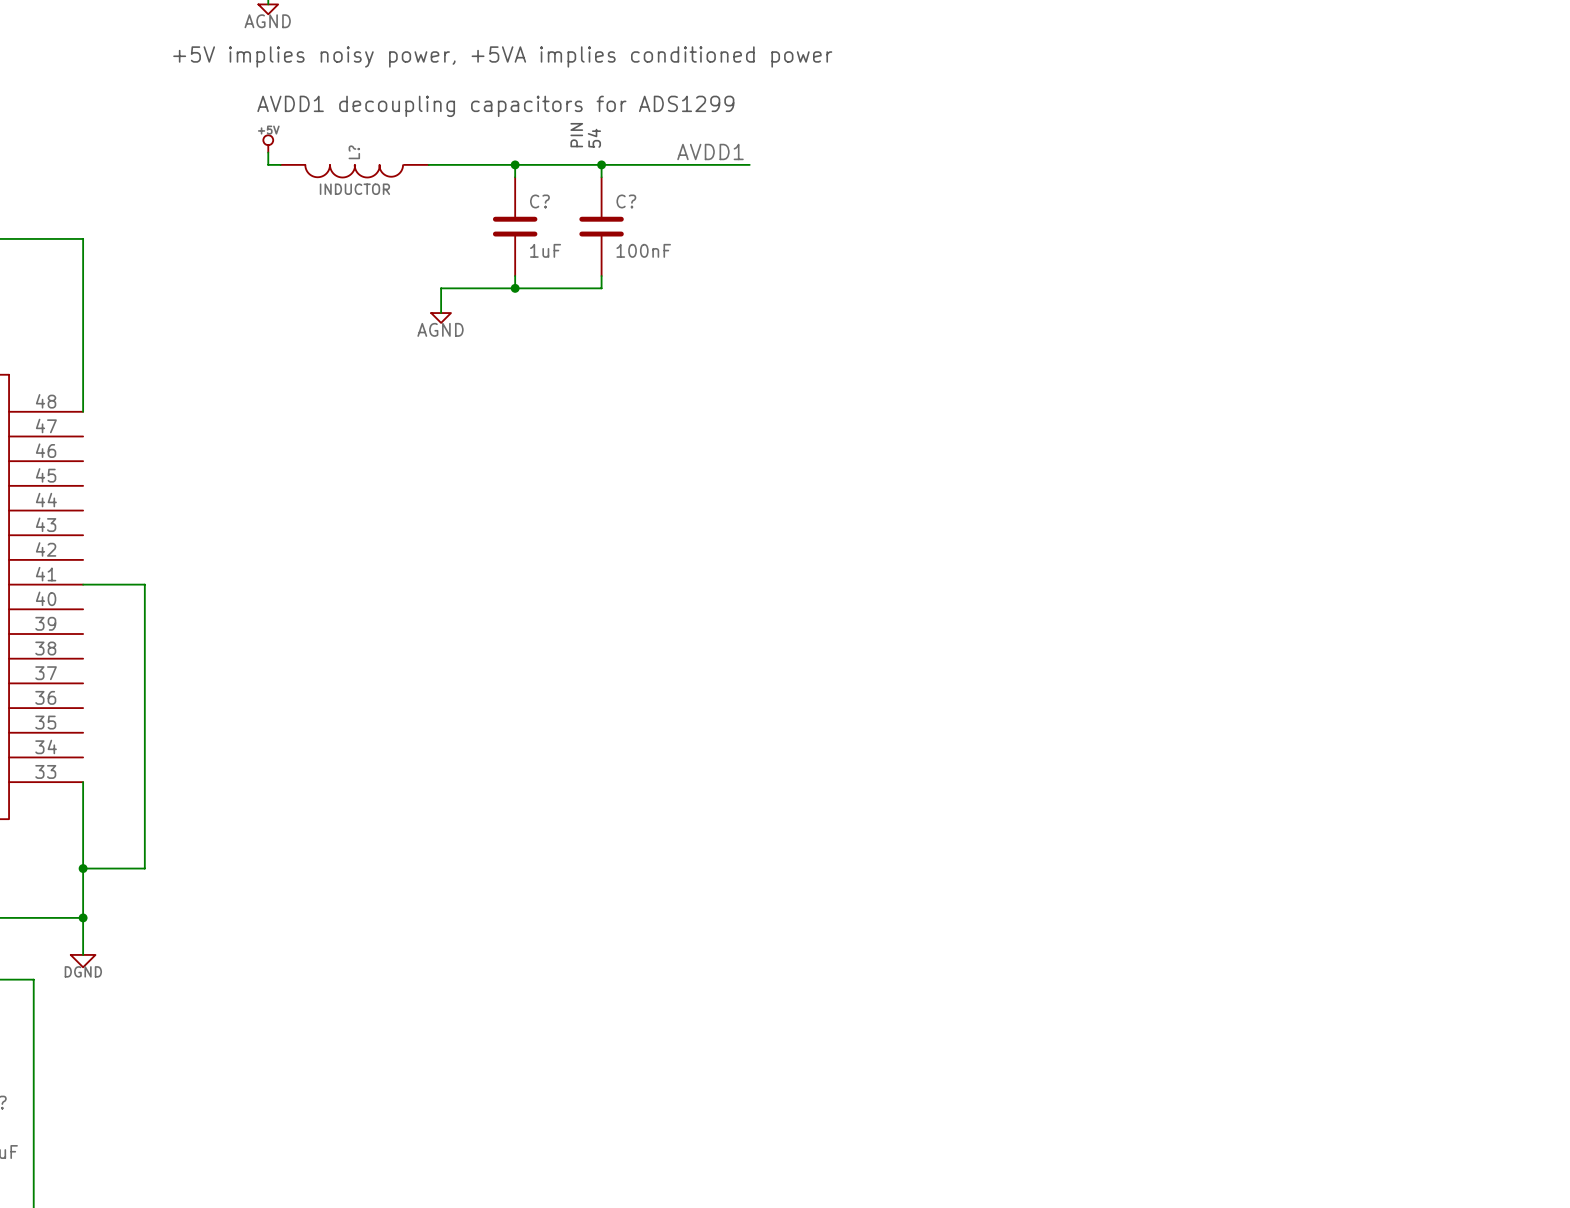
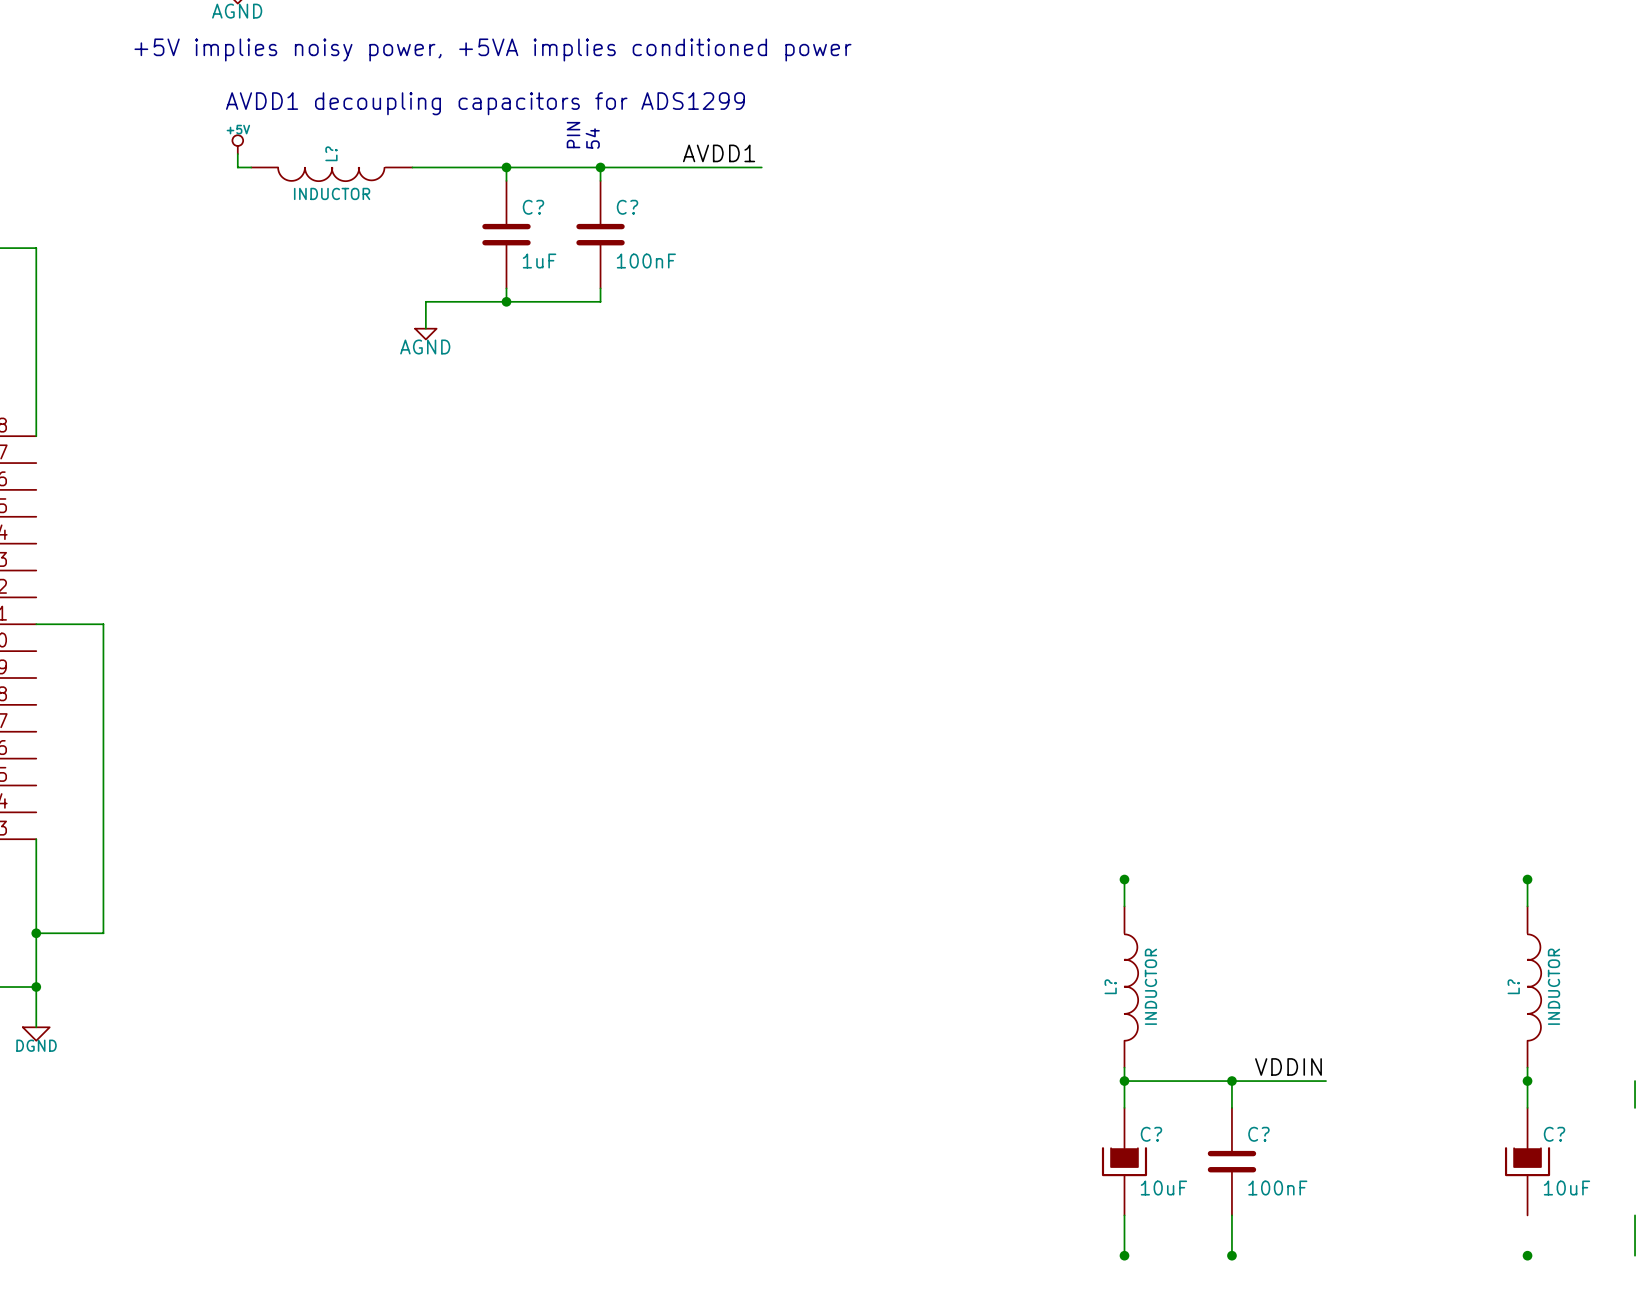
wire: none -> (1124, 879) (1124, 906)
junction: none -> (1124, 879)
wire: none -> (1527, 879) (1527, 906)
junction: none -> (1527, 879)
L?: none -> INDUCTOR (1131, 987)
L?: none -> INDUCTOR (1534, 987)
wire: none -> (1124, 1067) (1124, 1107)
label: none -> VDDIN (1288, 1066)
wire: none -> (1527, 1067) (1527, 1107)
wire: none -> (1124, 1081) (1326, 1081)
junction: none -> (1124, 1081)
wire: none -> (1231, 1081) (1231, 1107)
junction: none -> (1231, 1081)
junction: none -> (1527, 1081)
wire: none -> (1635, 1081) (1635, 1107)
C?: none -> 10uF (1124, 1161)
C?: none -> 100nF (1231, 1161)
C?: none -> 10uF (1527, 1161)
wire: none -> (1124, 1215) (1124, 1255)
wire: none -> (1231, 1215) (1231, 1255)
wire: none -> (1635, 1215) (1635, 1255)
junction: none -> (1124, 1255)
junction: none -> (1231, 1255)
junction: none -> (1527, 1255)

